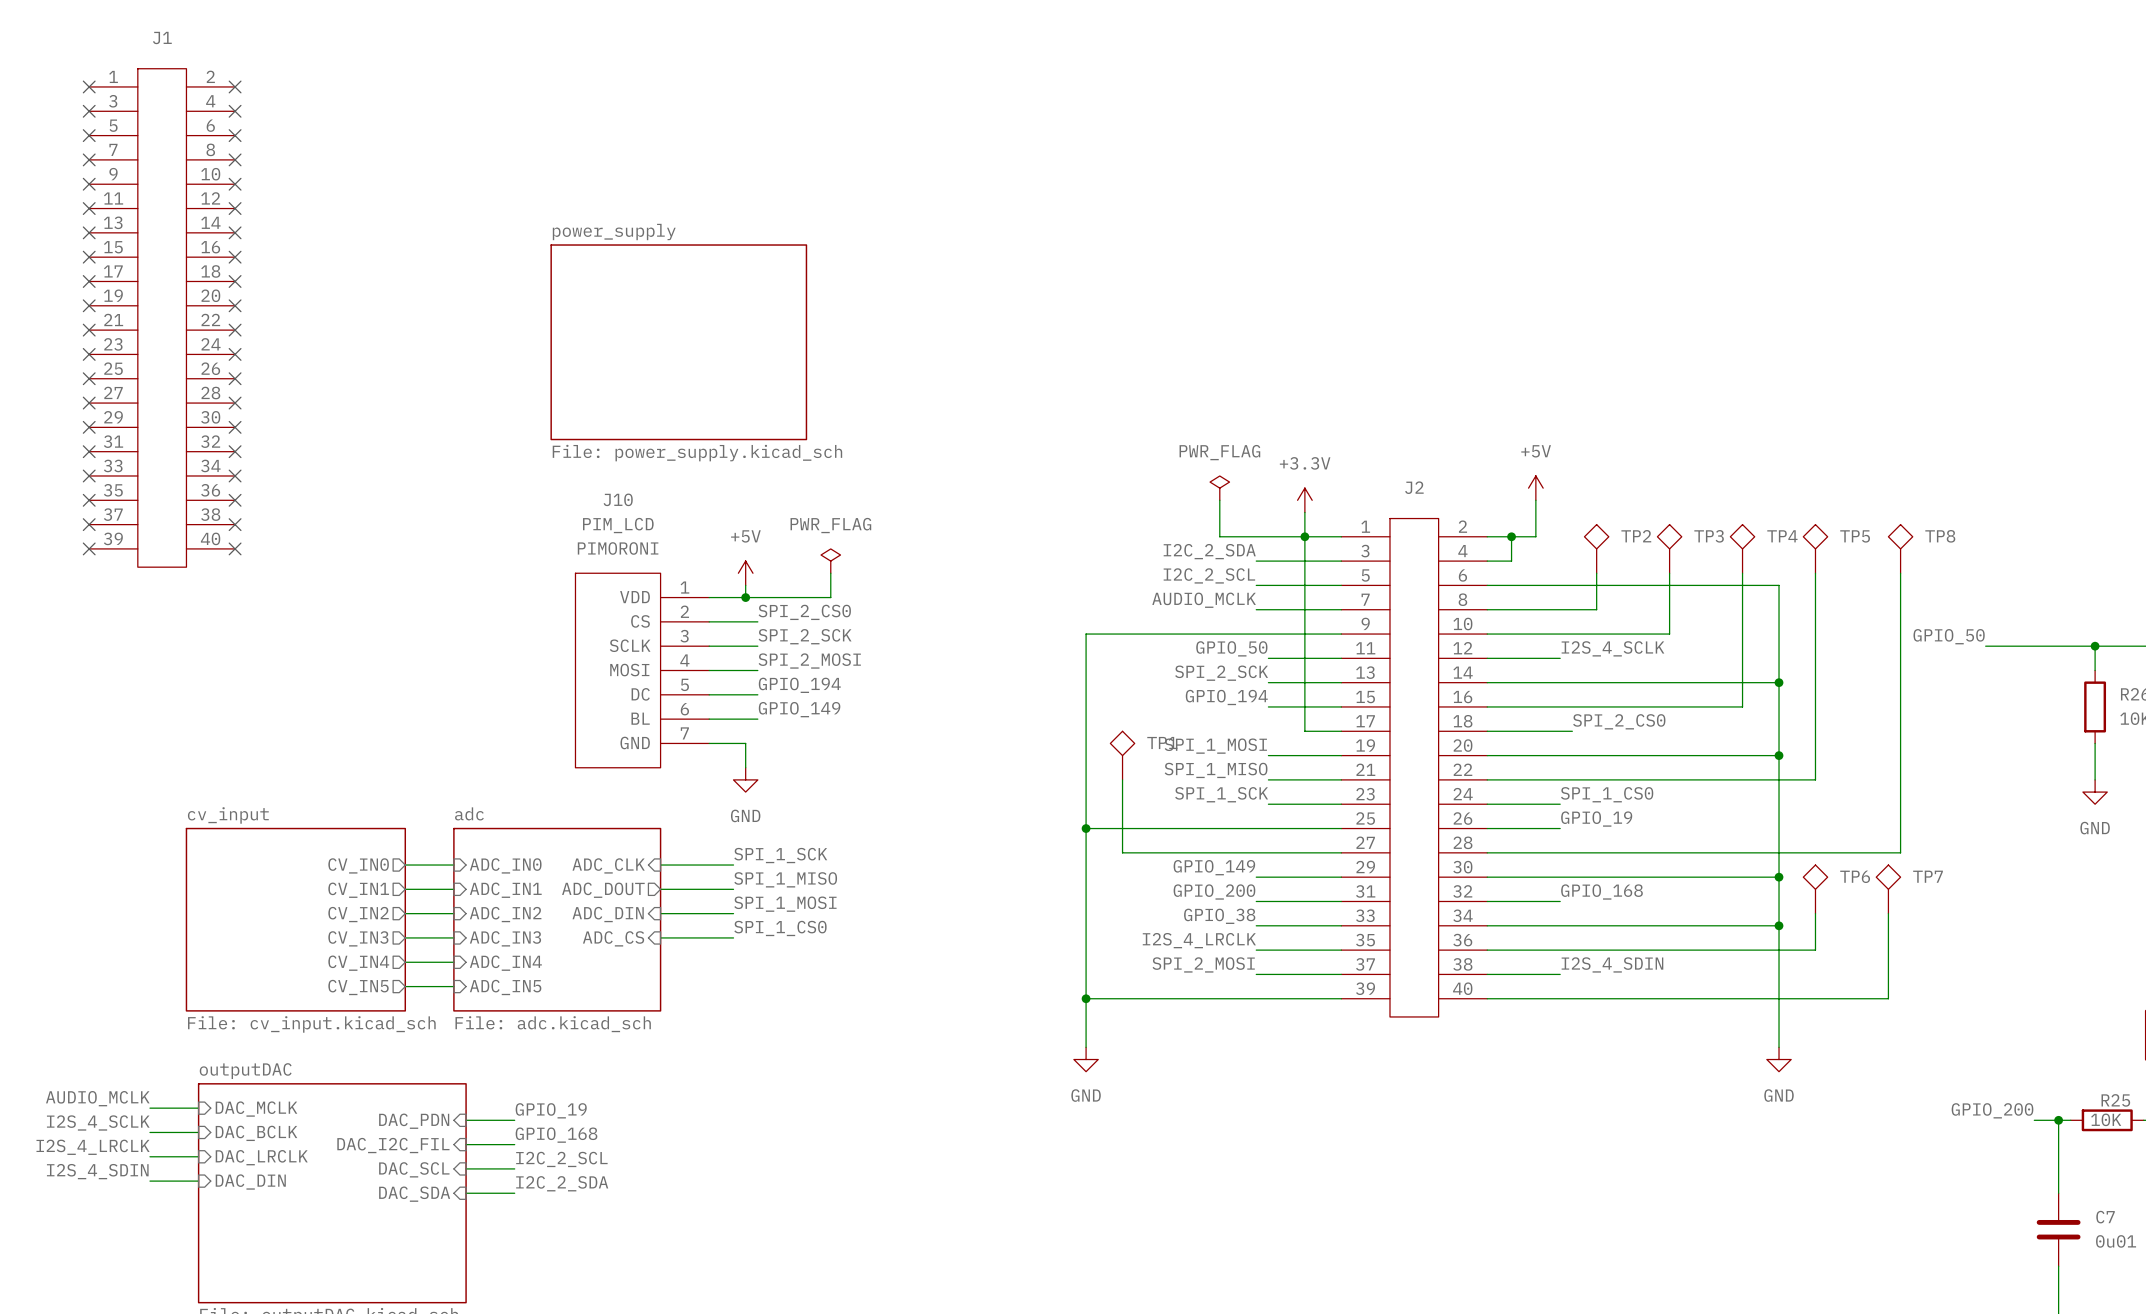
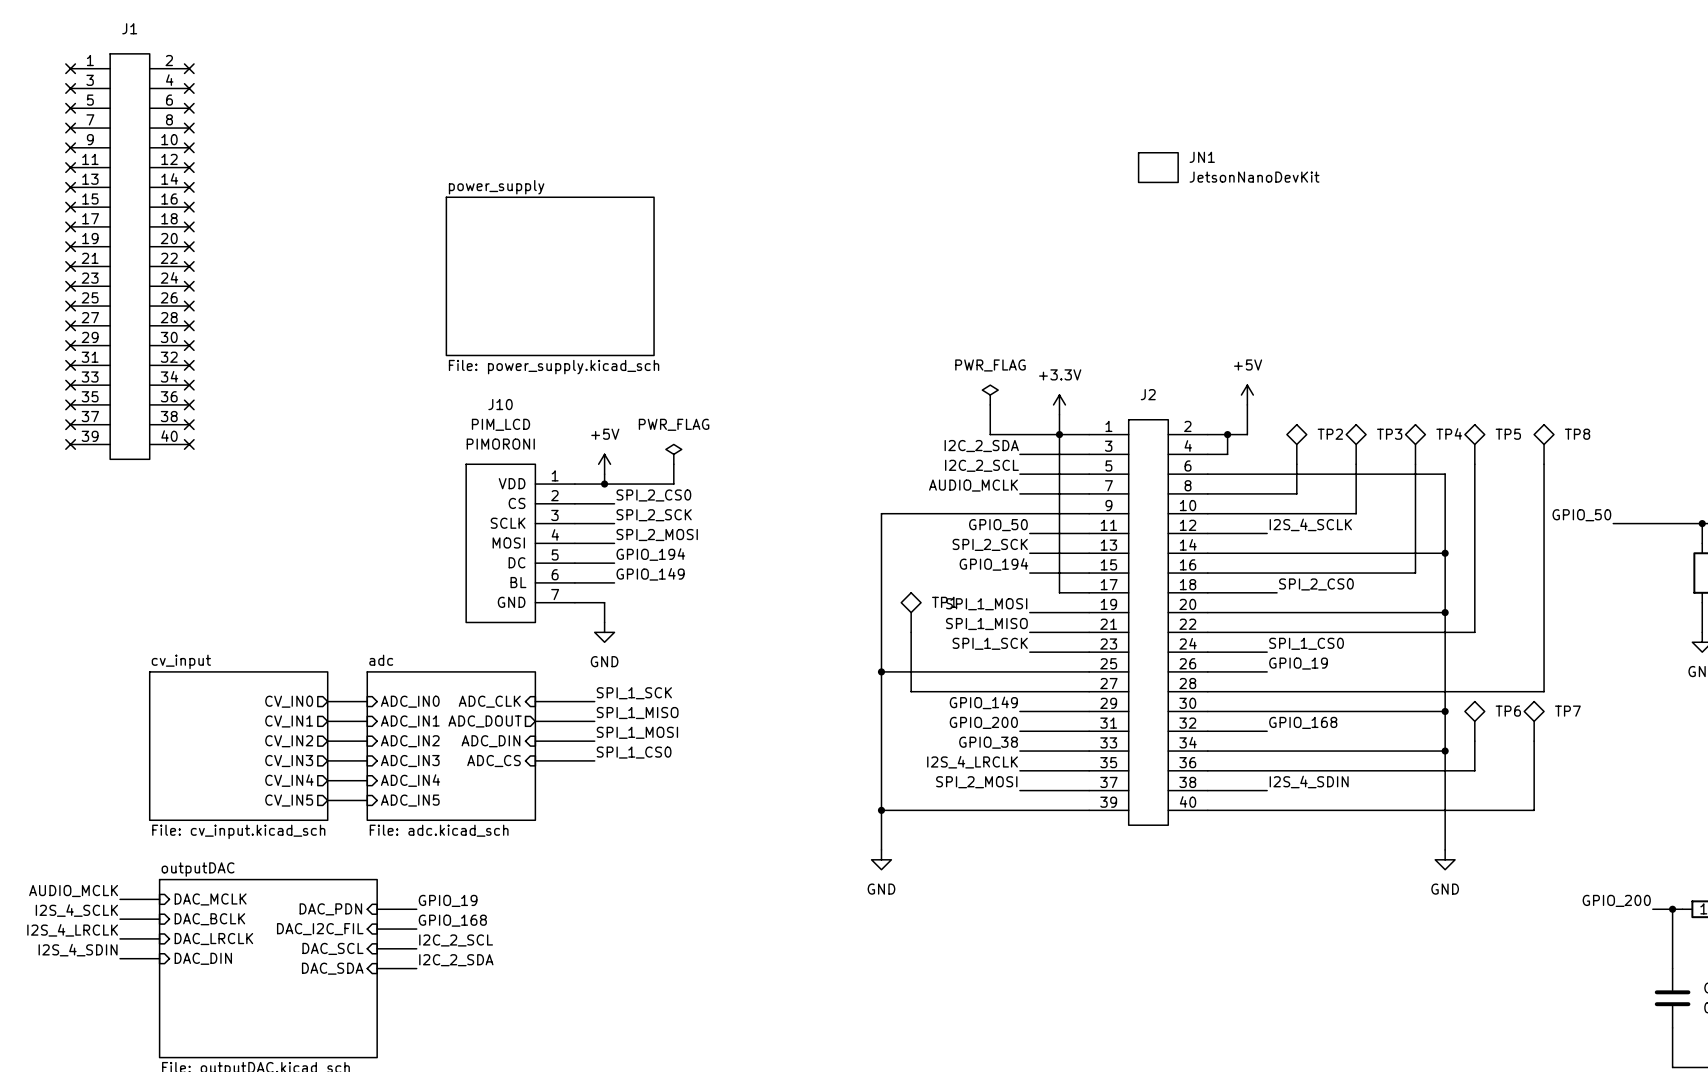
JN1: none -> (1158, 167)

